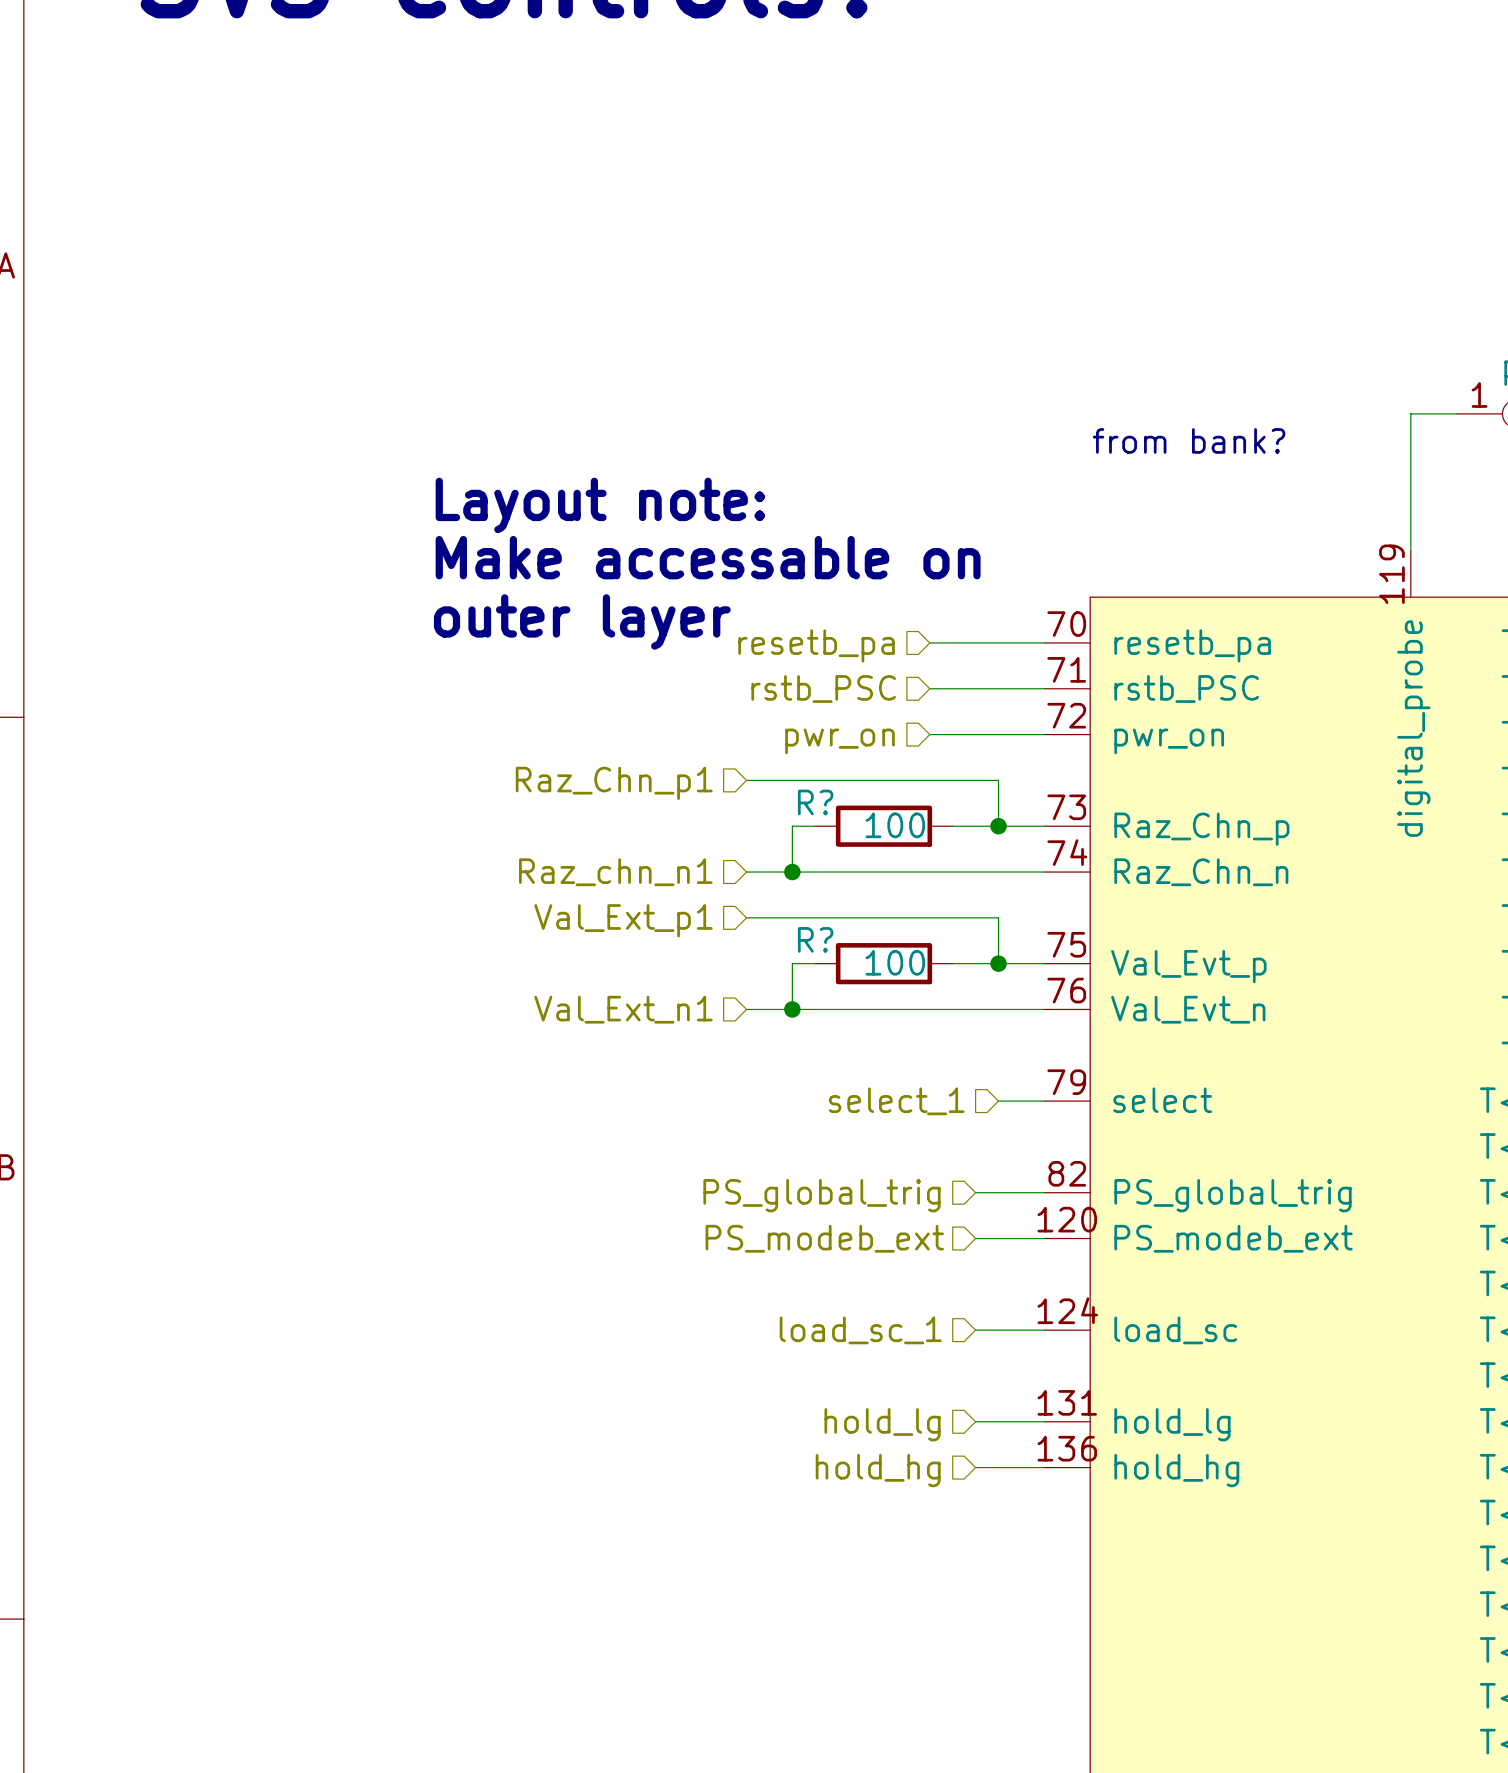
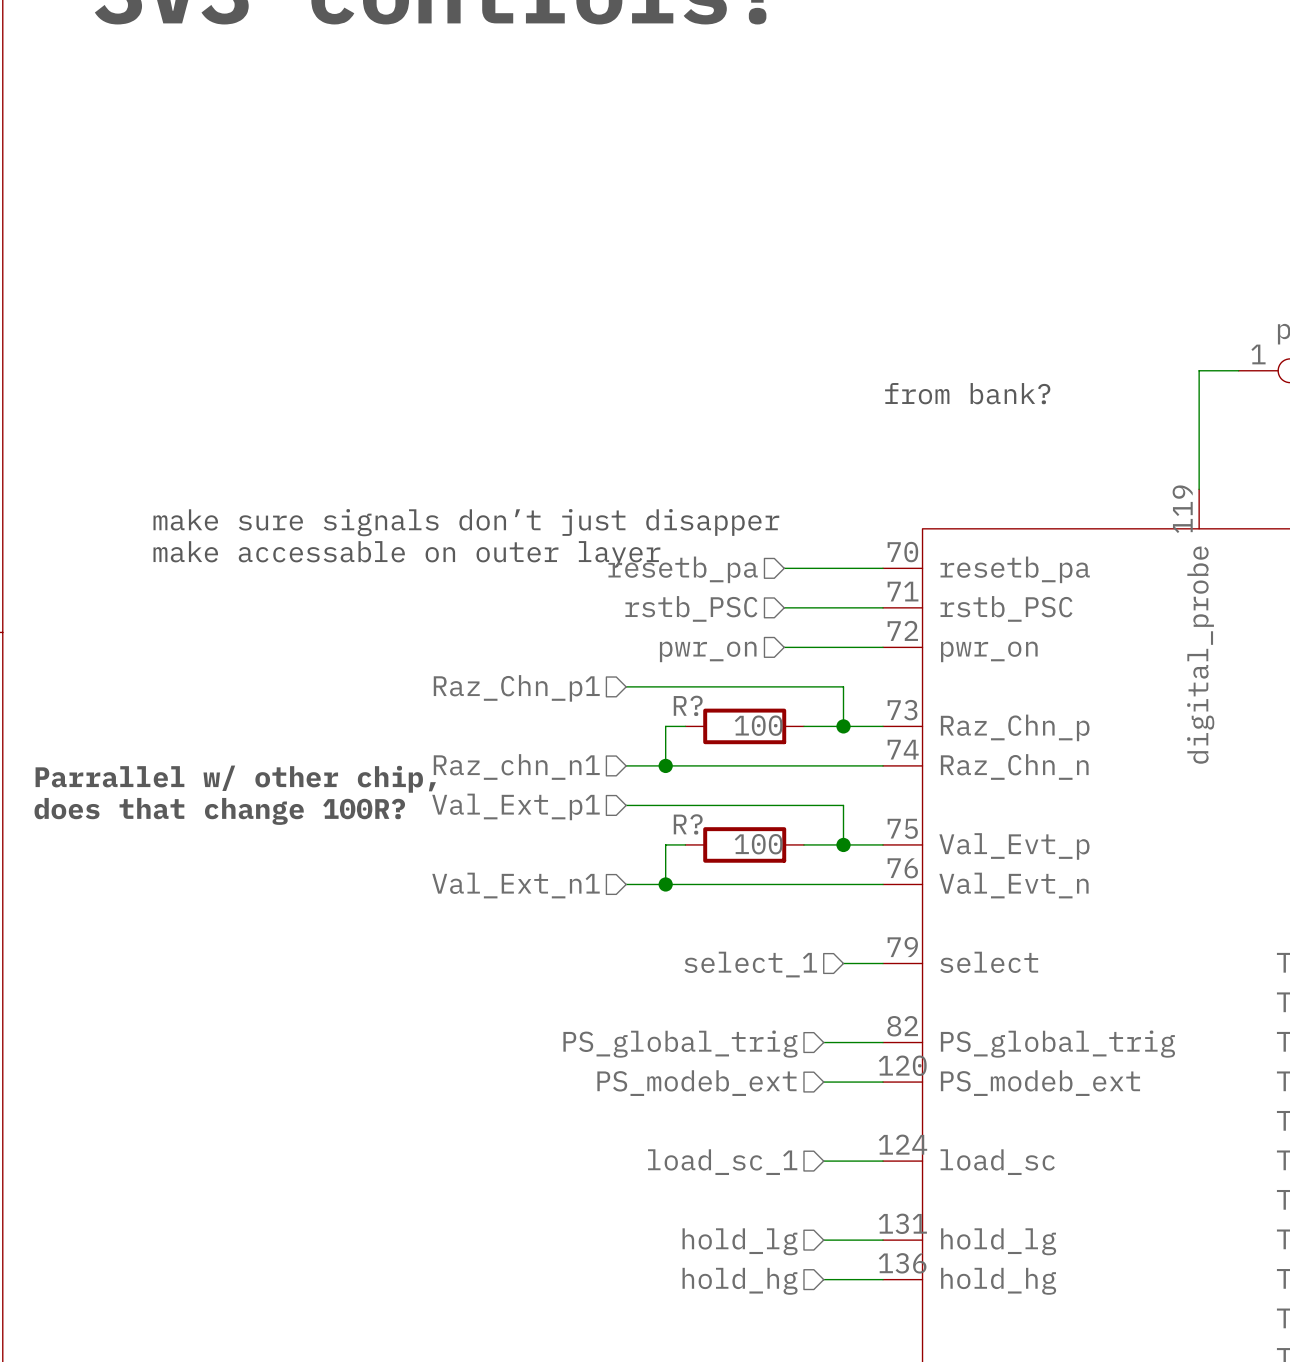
text position: from bank? (1189, 440) -> from bank? (967, 393)
text: Layout note: (600, 505) -> none
text: Make accessable on (708, 557) -> none
text: none -> make sure signals don’t just disapper (466, 522)
text: outer layer (582, 621) -> none
text: none -> make accessable on outer layer (406, 554)
text: none -> Parrallel w/ other chip, (235, 779)
text: none -> does that change 100R? (219, 811)

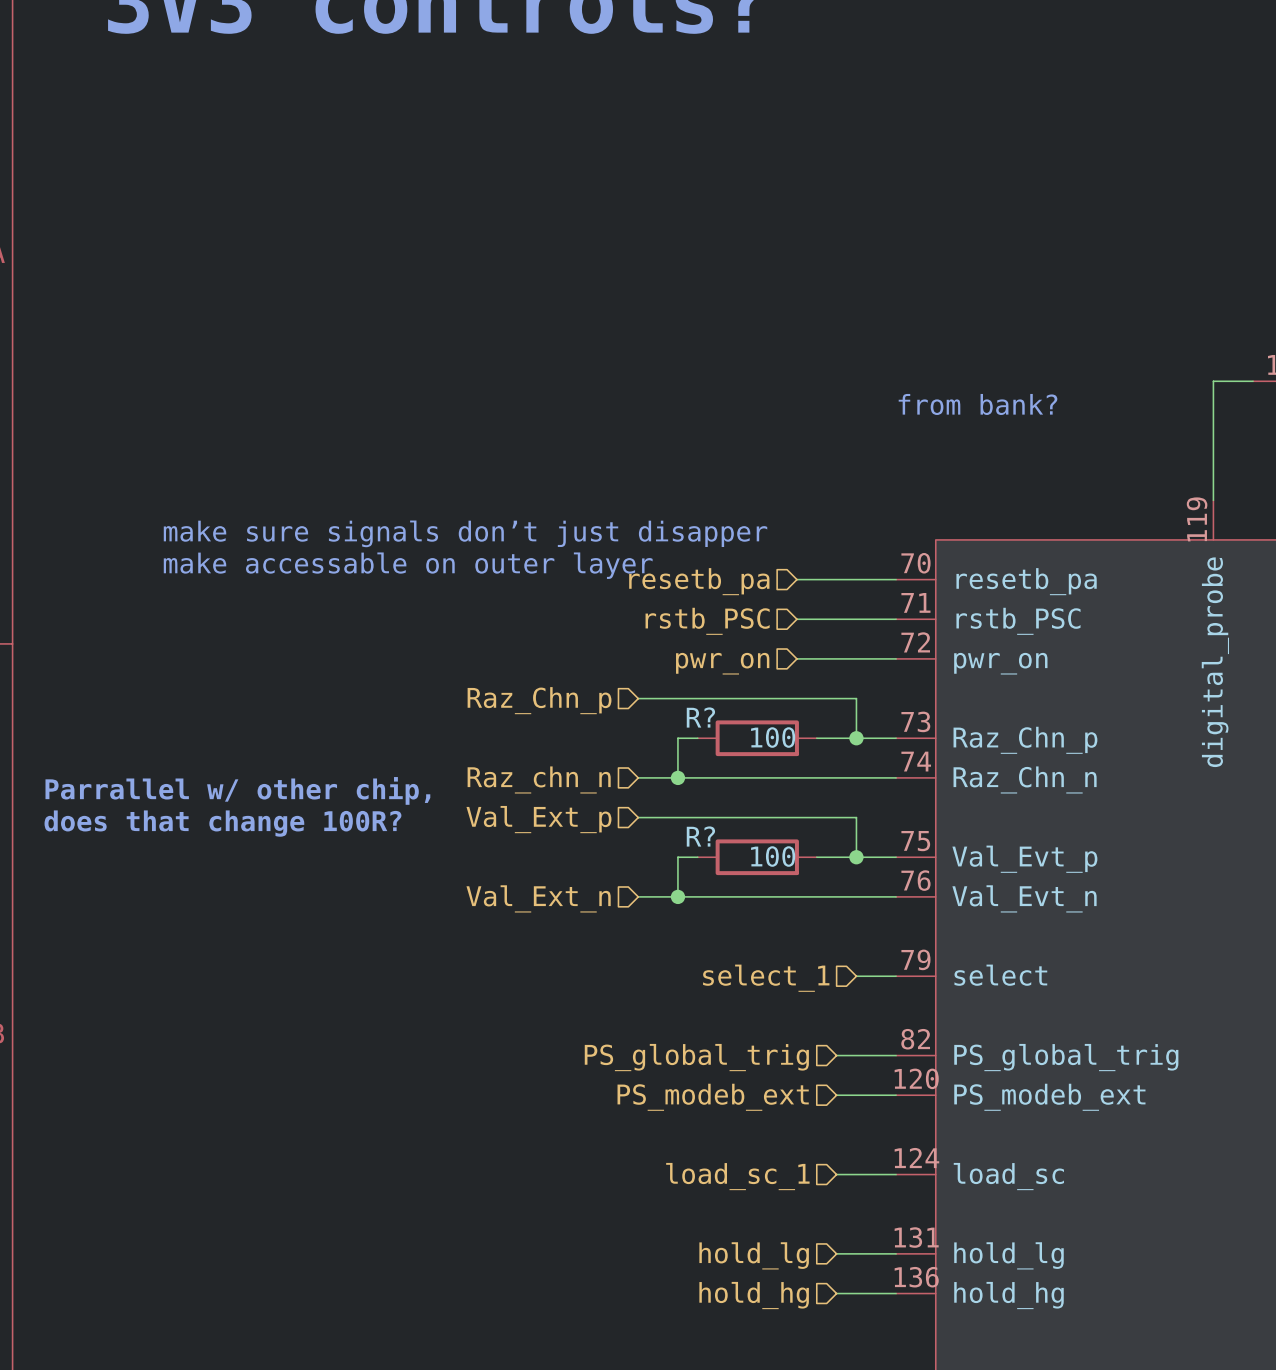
hierarchical label: Raz_Chn_p1 (516, 688) -> Raz_Chn_p (539, 700)
hierarchical label: Raz_chn_n1 (516, 766) -> Raz_chn_n (539, 779)
hierarchical label: Val_Ext_p1 (515, 806) -> Val_Ext_p (538, 819)
hierarchical label: Val_Ext_n1 (515, 885) -> Val_Ext_n (538, 898)

